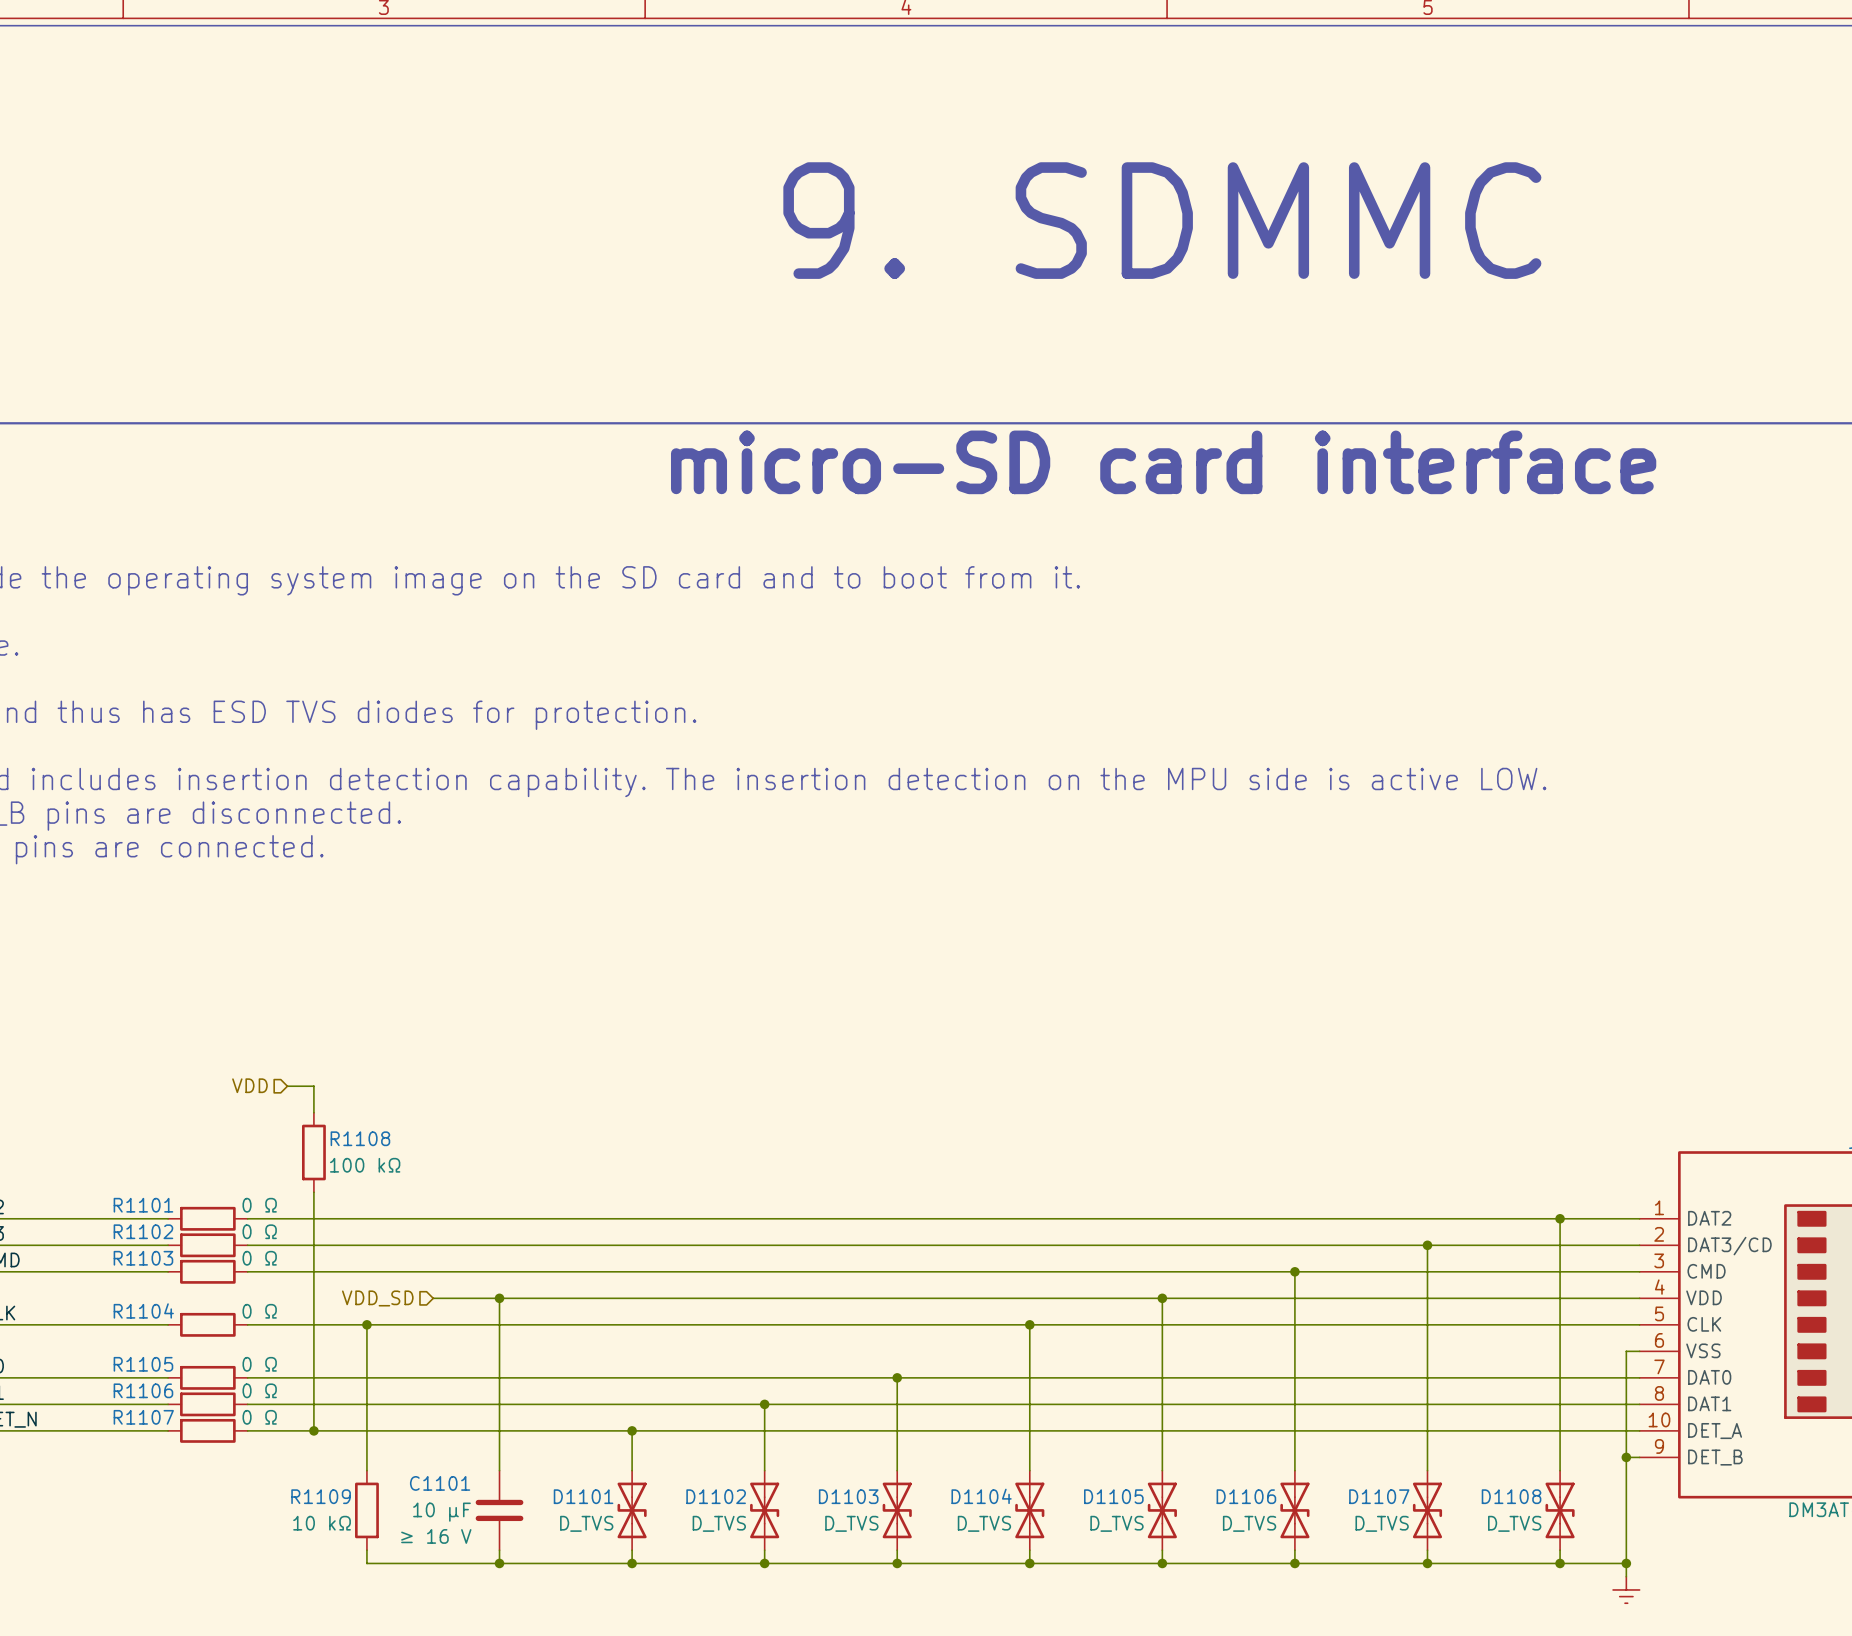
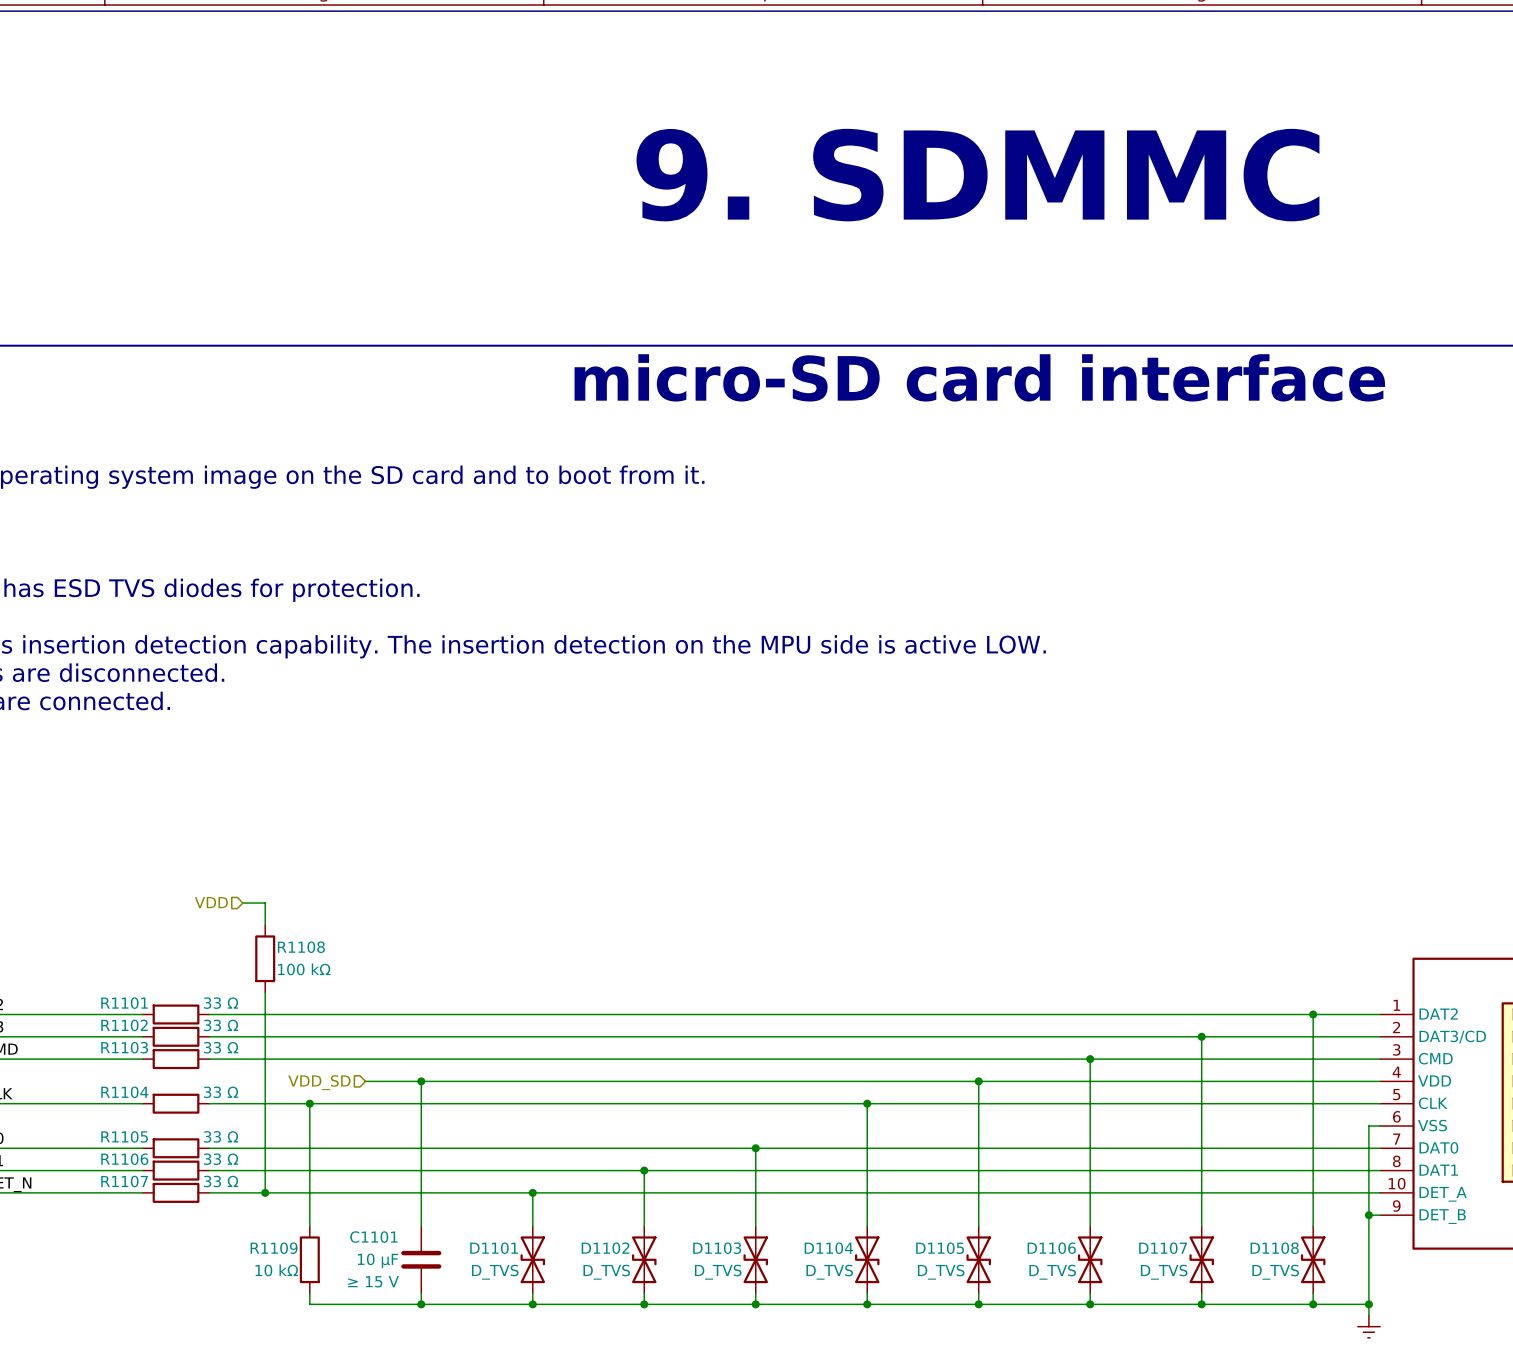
R1101 value: 0 Ω (259, 1205) -> 33 Ω (221, 1003)
R1102 value: 0 Ω (259, 1231) -> 33 Ω (221, 1025)
R1103 value: 0 Ω (259, 1258) -> 33 Ω (221, 1047)
R1104 value: 0 Ω (259, 1311) -> 33 Ω (221, 1092)
R1105 value: 0 Ω (259, 1364) -> 33 Ω (221, 1136)
R1106 value: 0 Ω (259, 1390) -> 33 Ω (221, 1159)
R1107 value: 0 Ω (259, 1417) -> 33 Ω (221, 1181)
C1101 text: ≥ 16 V (436, 1536) -> ≥ 15 V (373, 1281)

